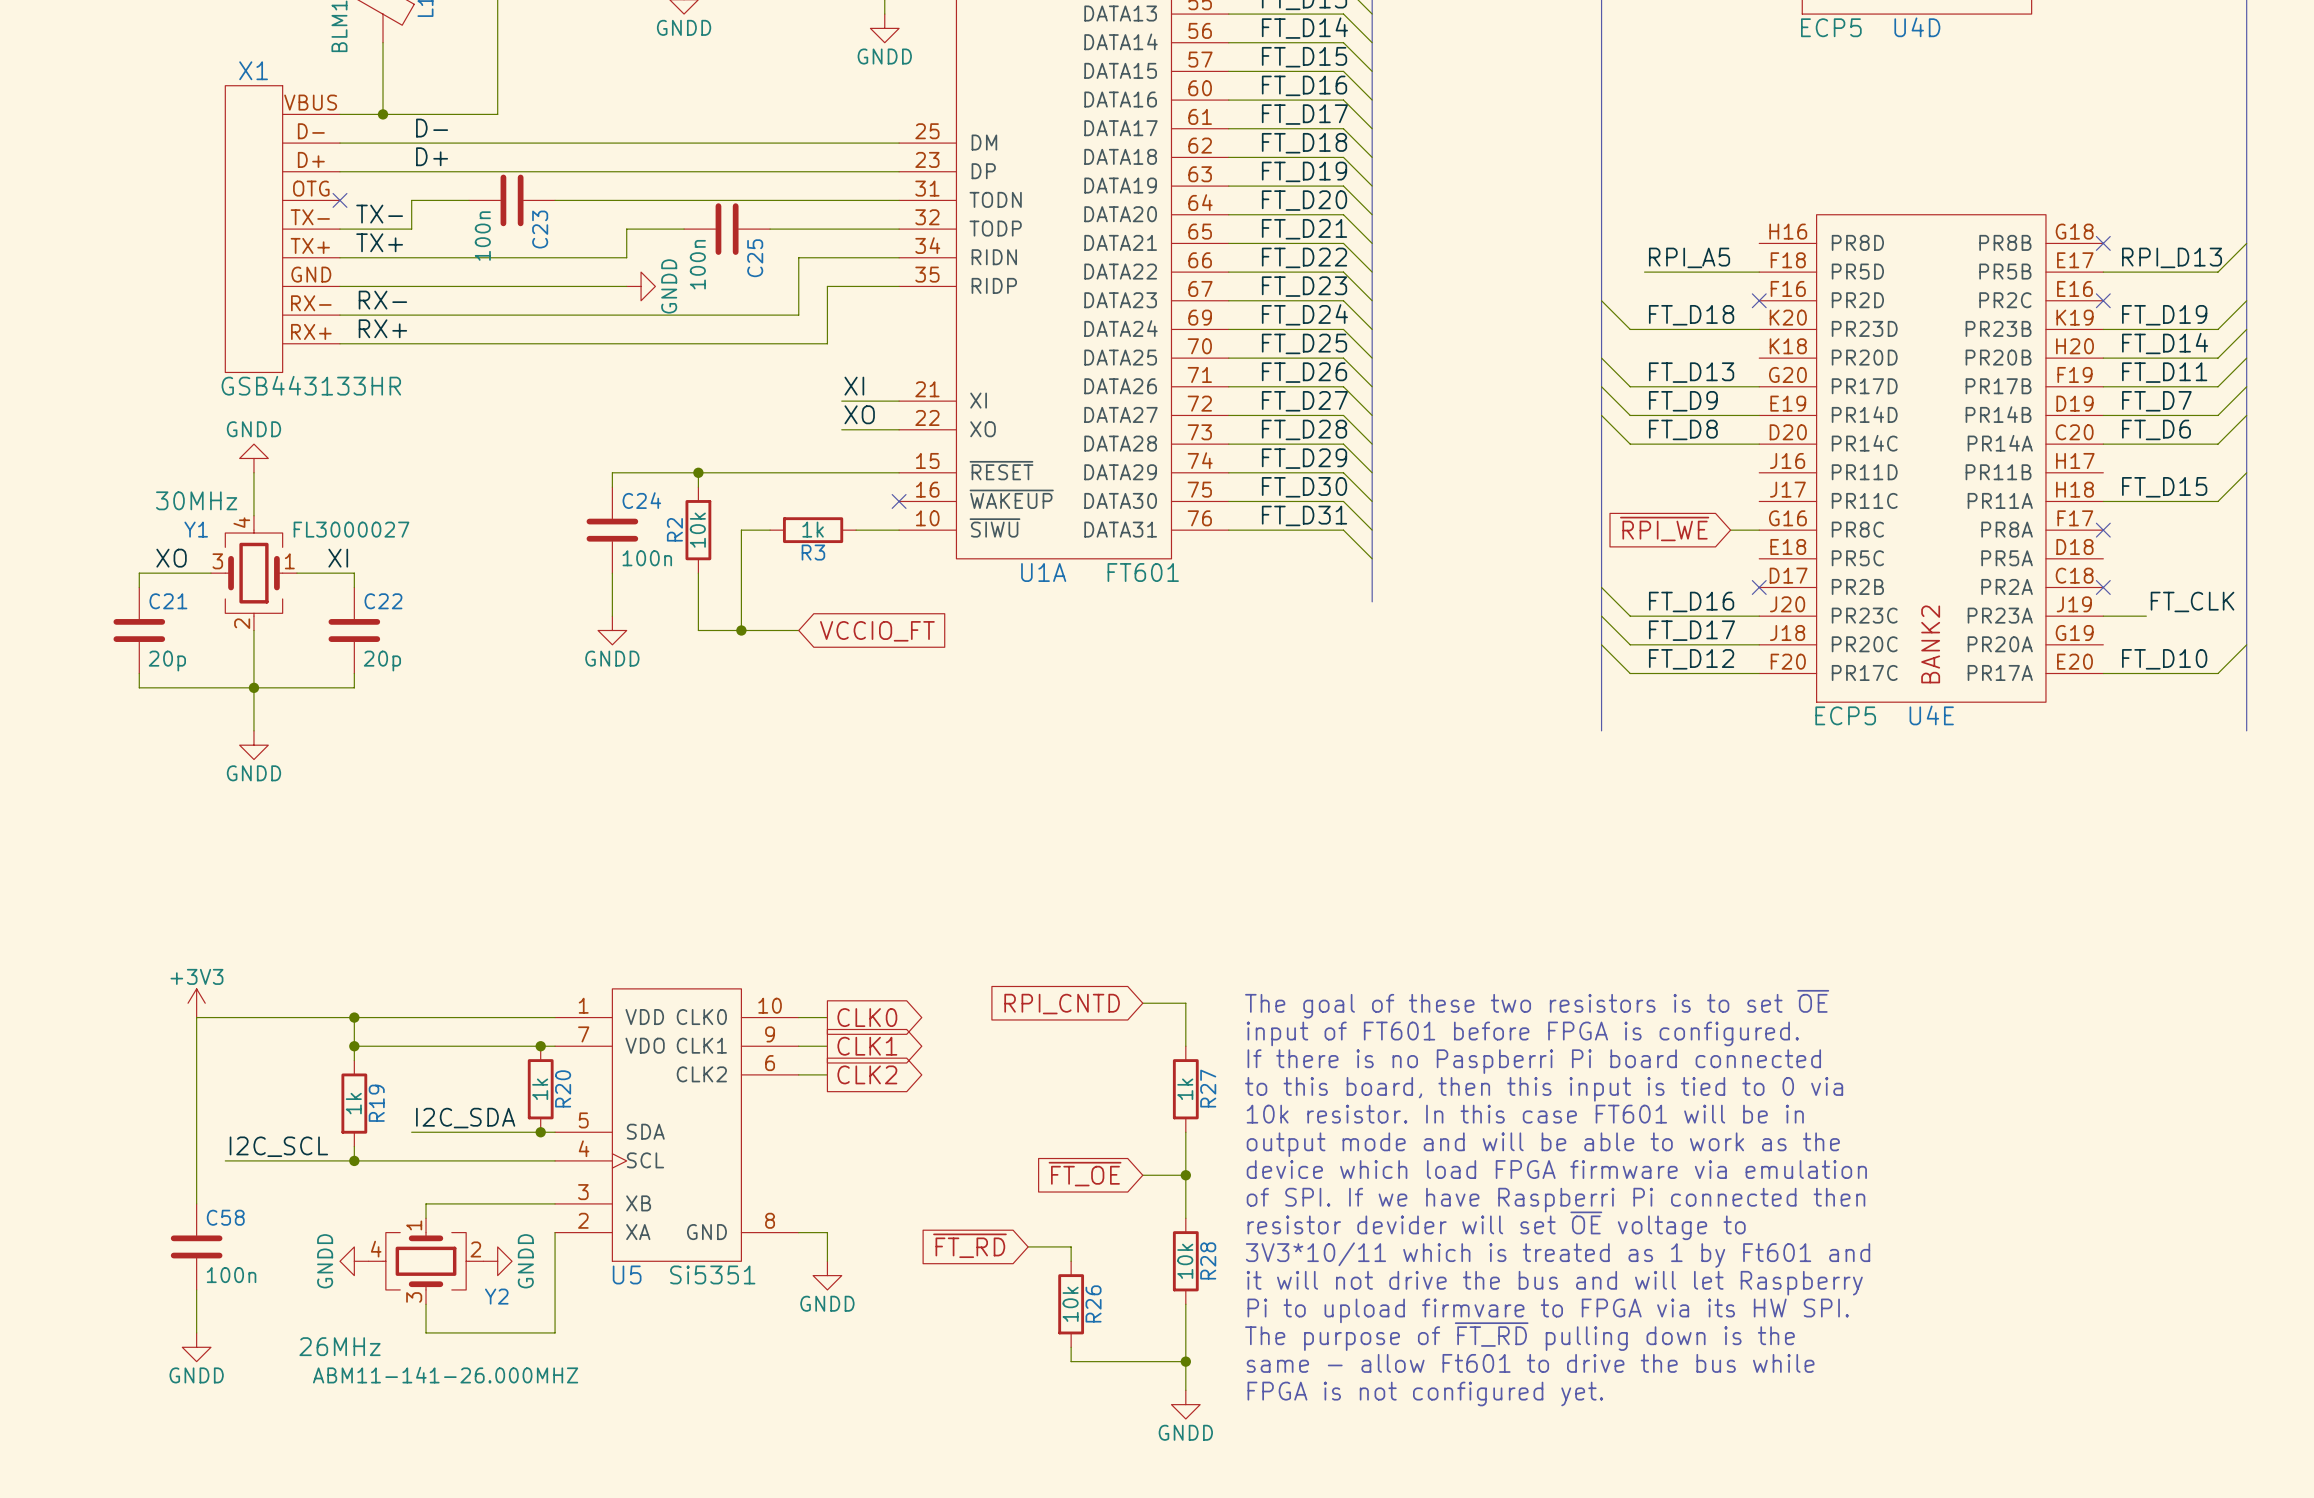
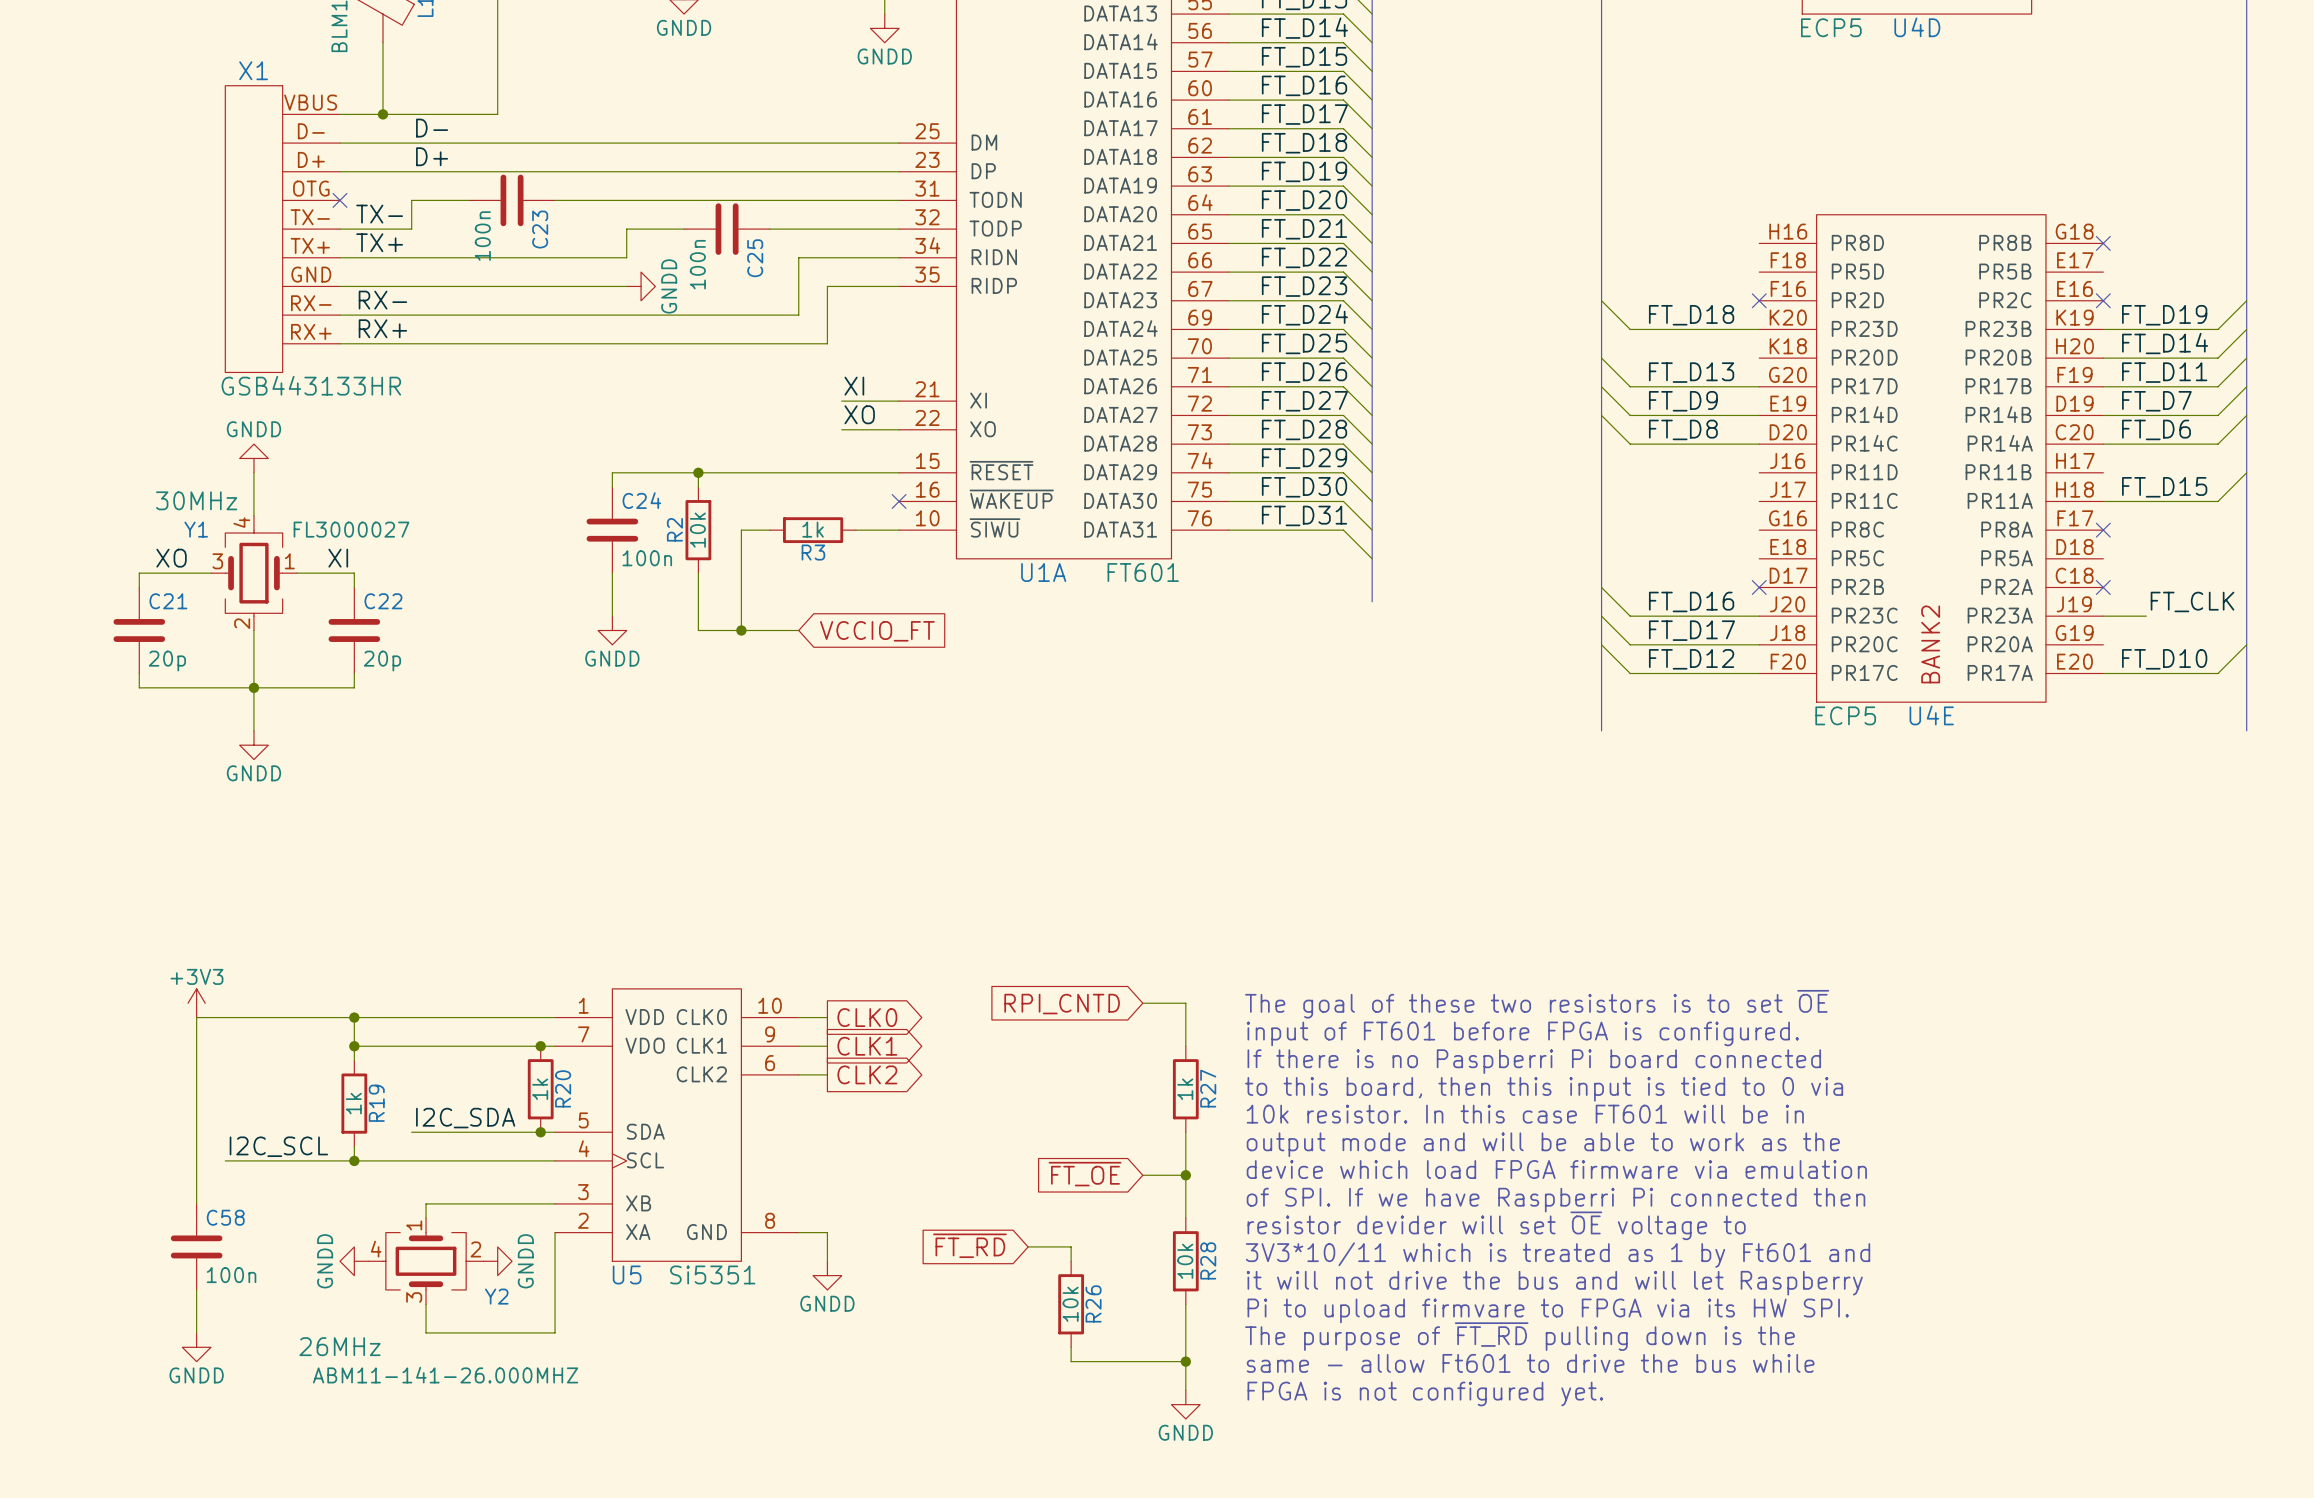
wire: (2246, 243) (2218, 272) (2103, 272) -> none
label: RPI_A5 (1689, 257) -> none
label: RPI_D13 (2172, 257) -> none
wire: (1644, 272) (1759, 272) -> none
global label: ~{RPI_WE} (1664, 528) -> none
wire: (1730, 530) (1759, 530) -> none

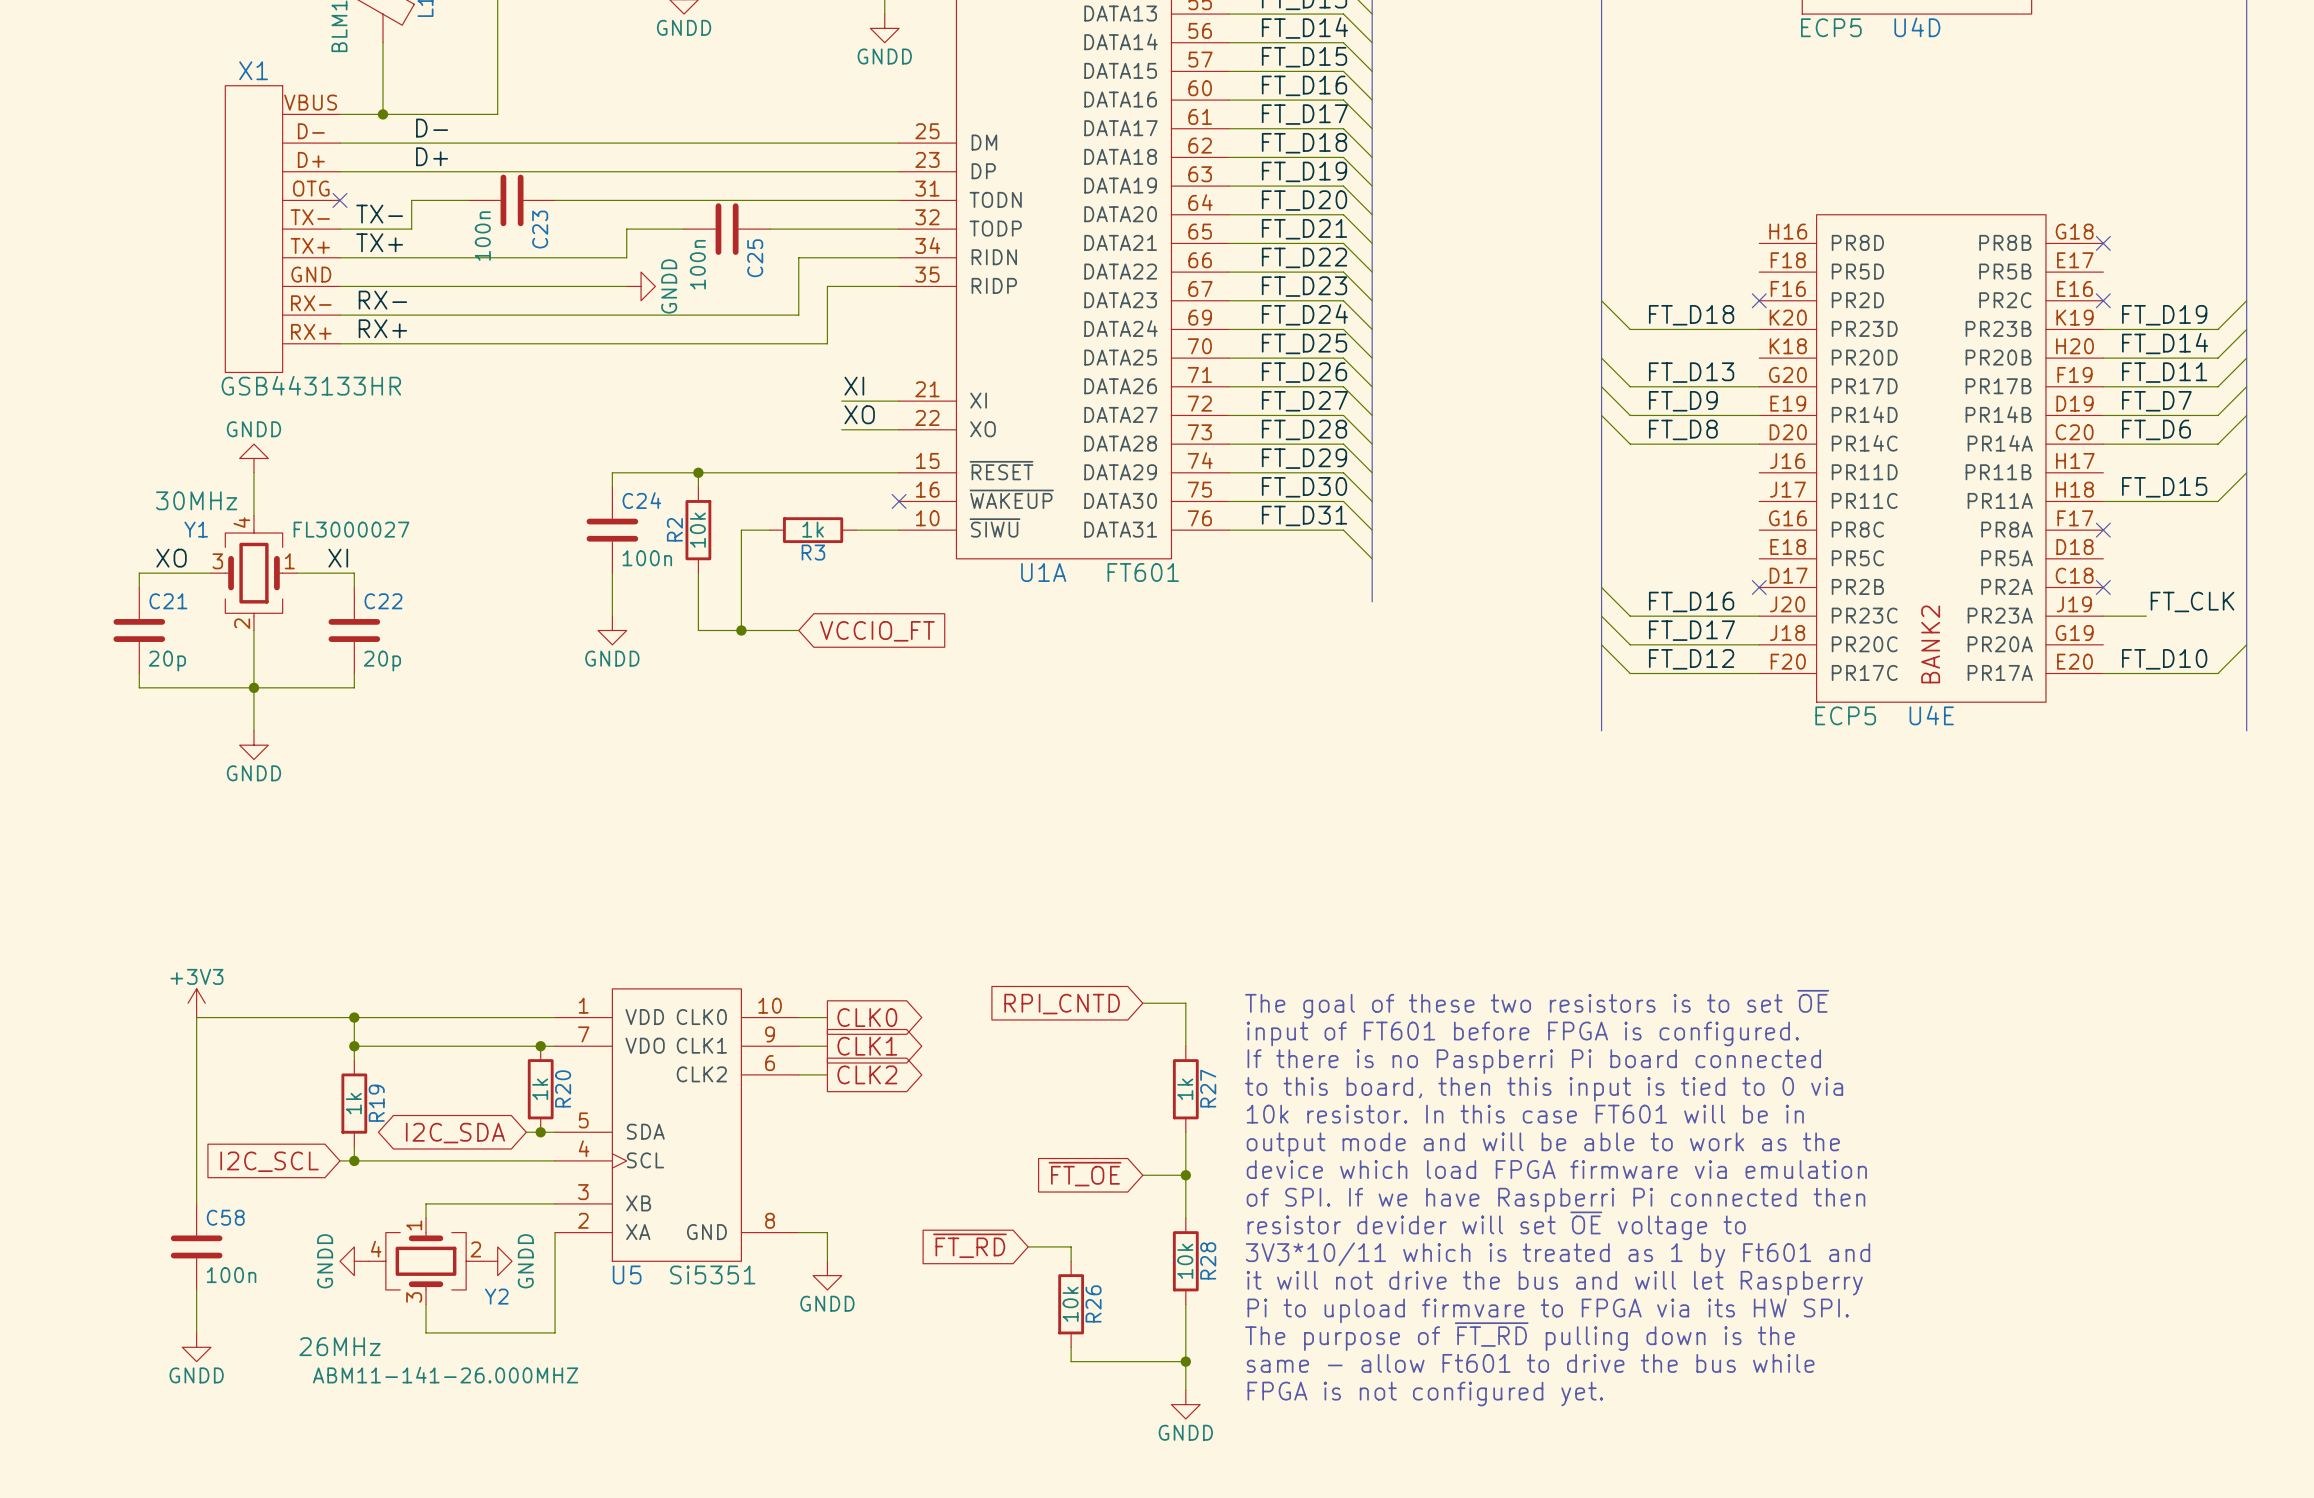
label: I2C_SDA (465, 1118) -> none
wire: (411, 1132) (526, 1132) -> none
global label: none -> I2C_SDA (455, 1133)
label: I2C_SCL (278, 1146) -> none
wire: (225, 1160) (339, 1160) -> none
global label: none -> I2C_SCL (269, 1161)

